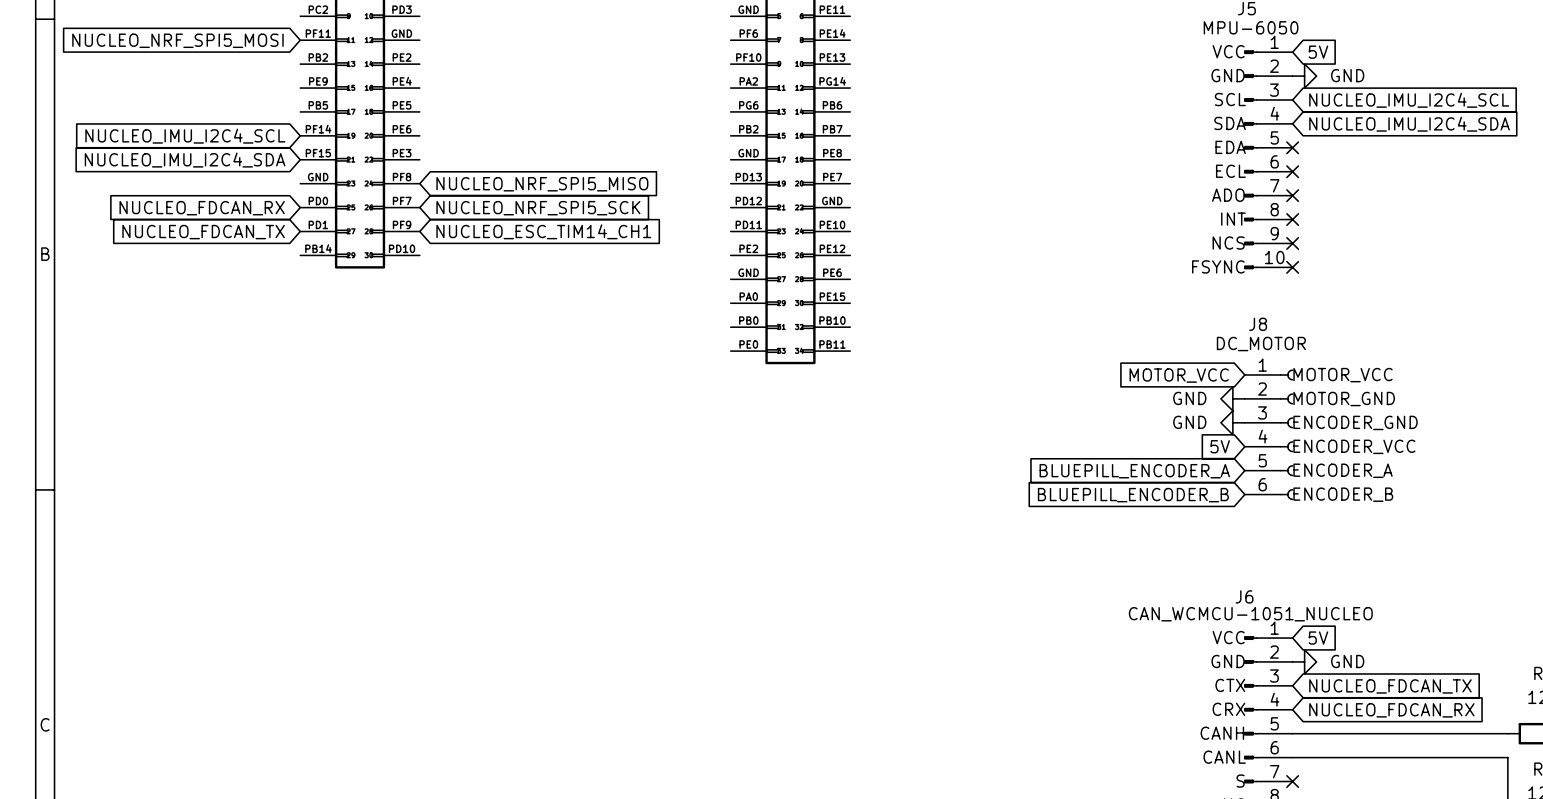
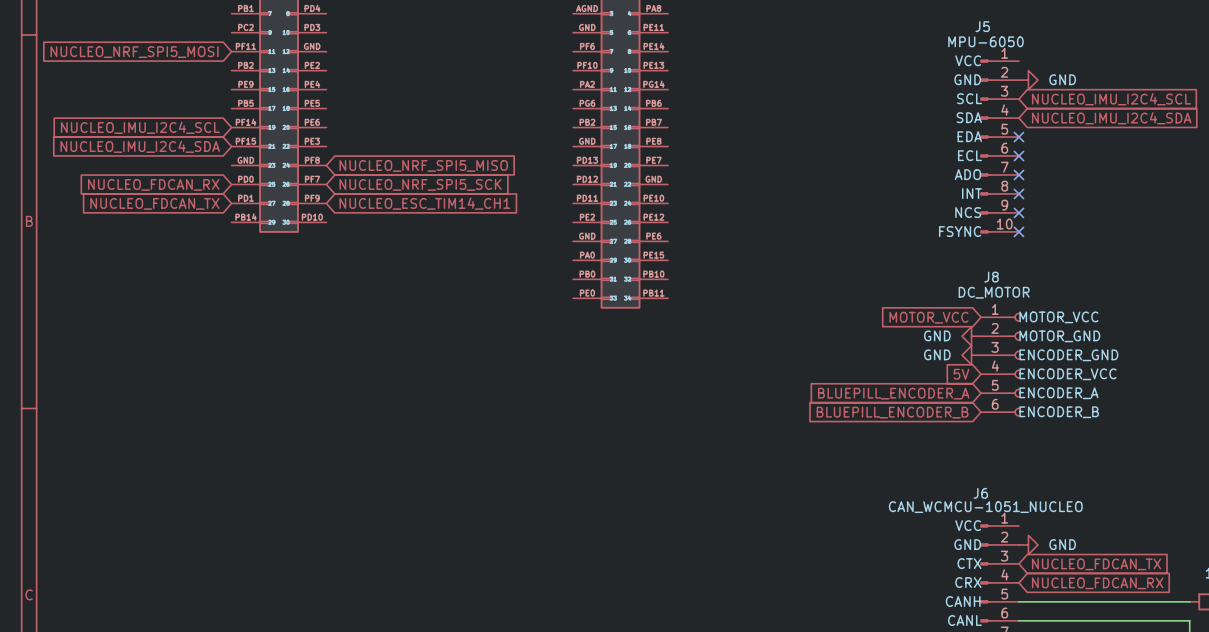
global label: 5V (1318, 52) -> none
global label: 5V (1318, 638) -> none

